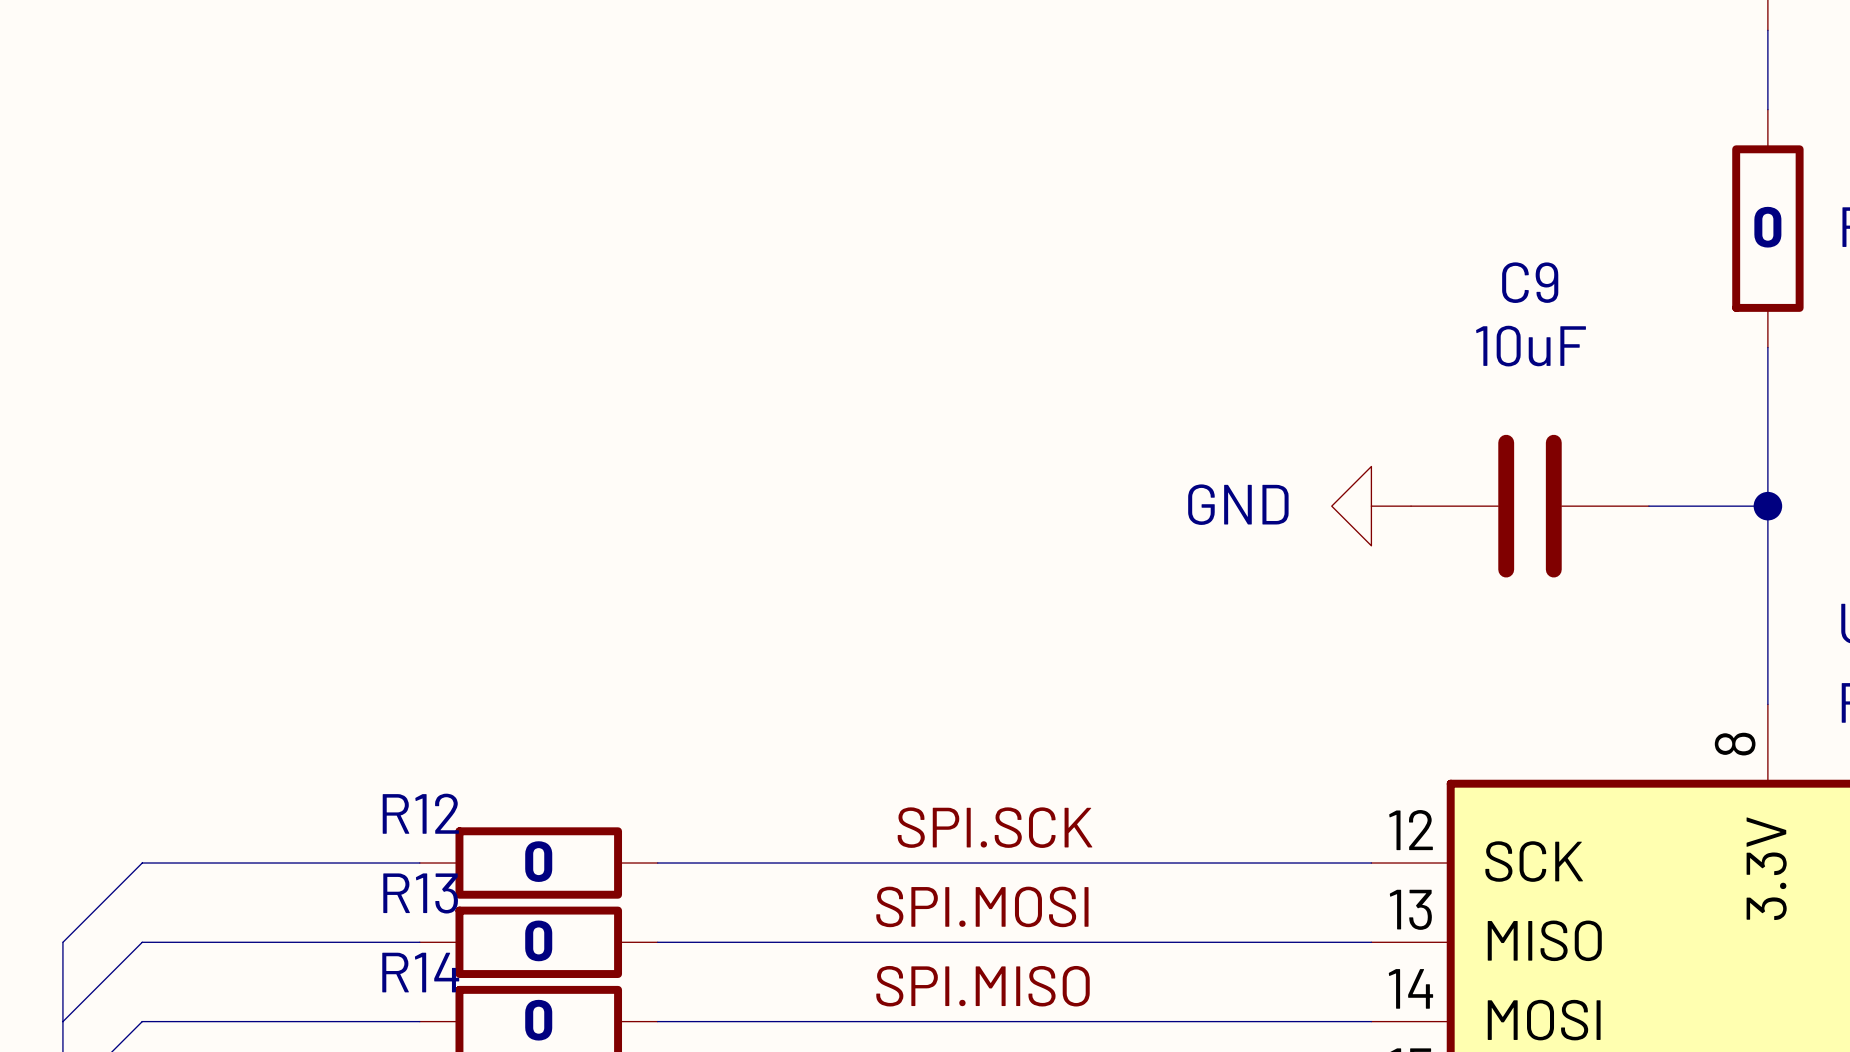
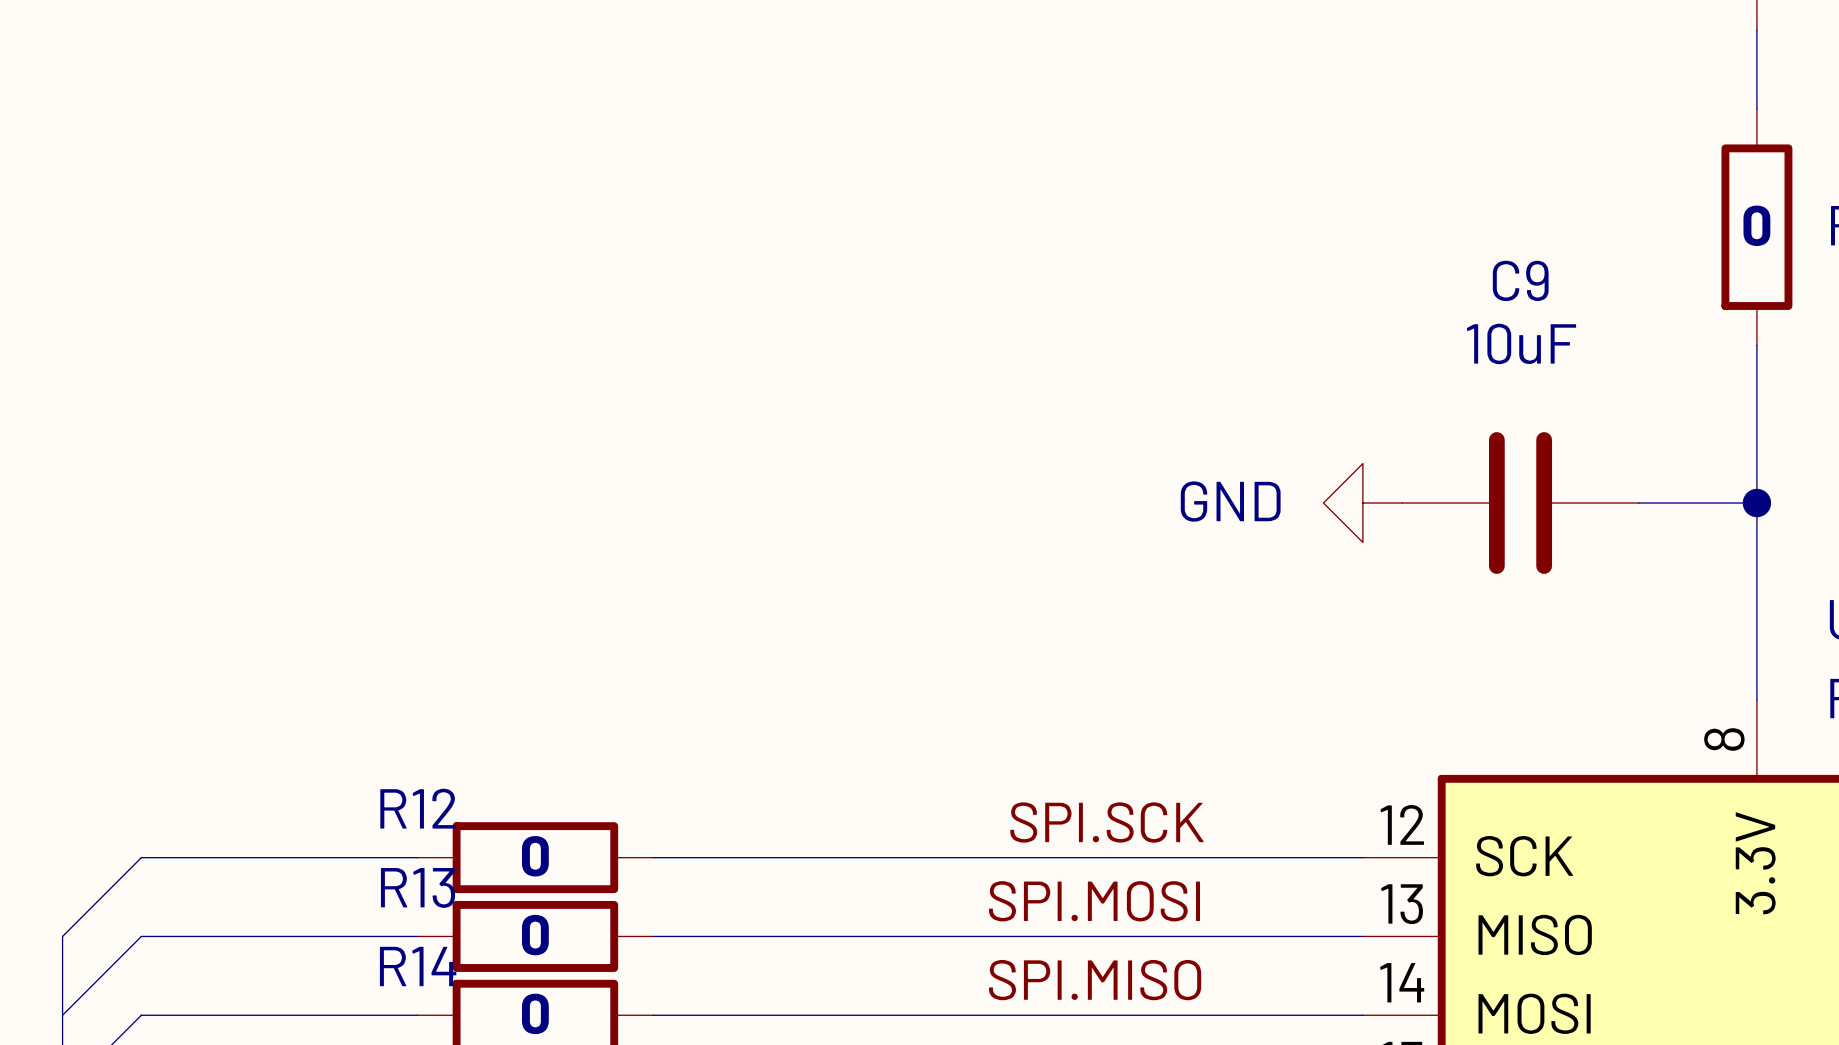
label position: SPI.SCK (995, 827) -> SPI.SCK (1107, 822)
label position: SPI.MOSI (982, 906) -> SPI.MOSI (1094, 901)
label position: SPI.MISO (983, 986) -> SPI.MISO (1095, 980)

